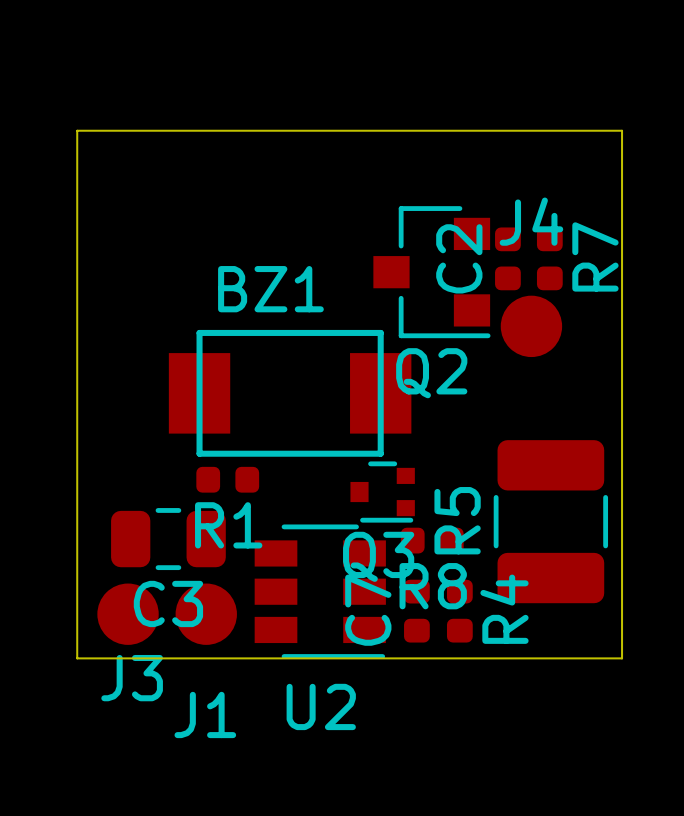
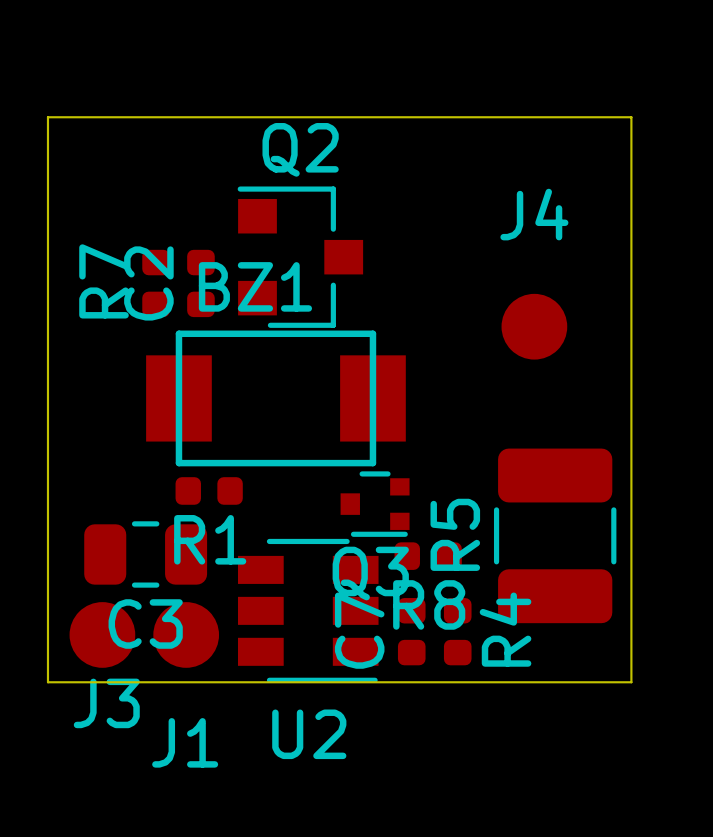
R7 name position: R7 (595, 256) -> R7 (104, 281)
C2 position: (507, 258) -> (200, 283)
R7 position: (549, 258) -> (156, 283)
Q2 rotation: 0° (431, 272) -> 180° (300, 257)
Q2 position: (431, 272) -> (300, 257)

